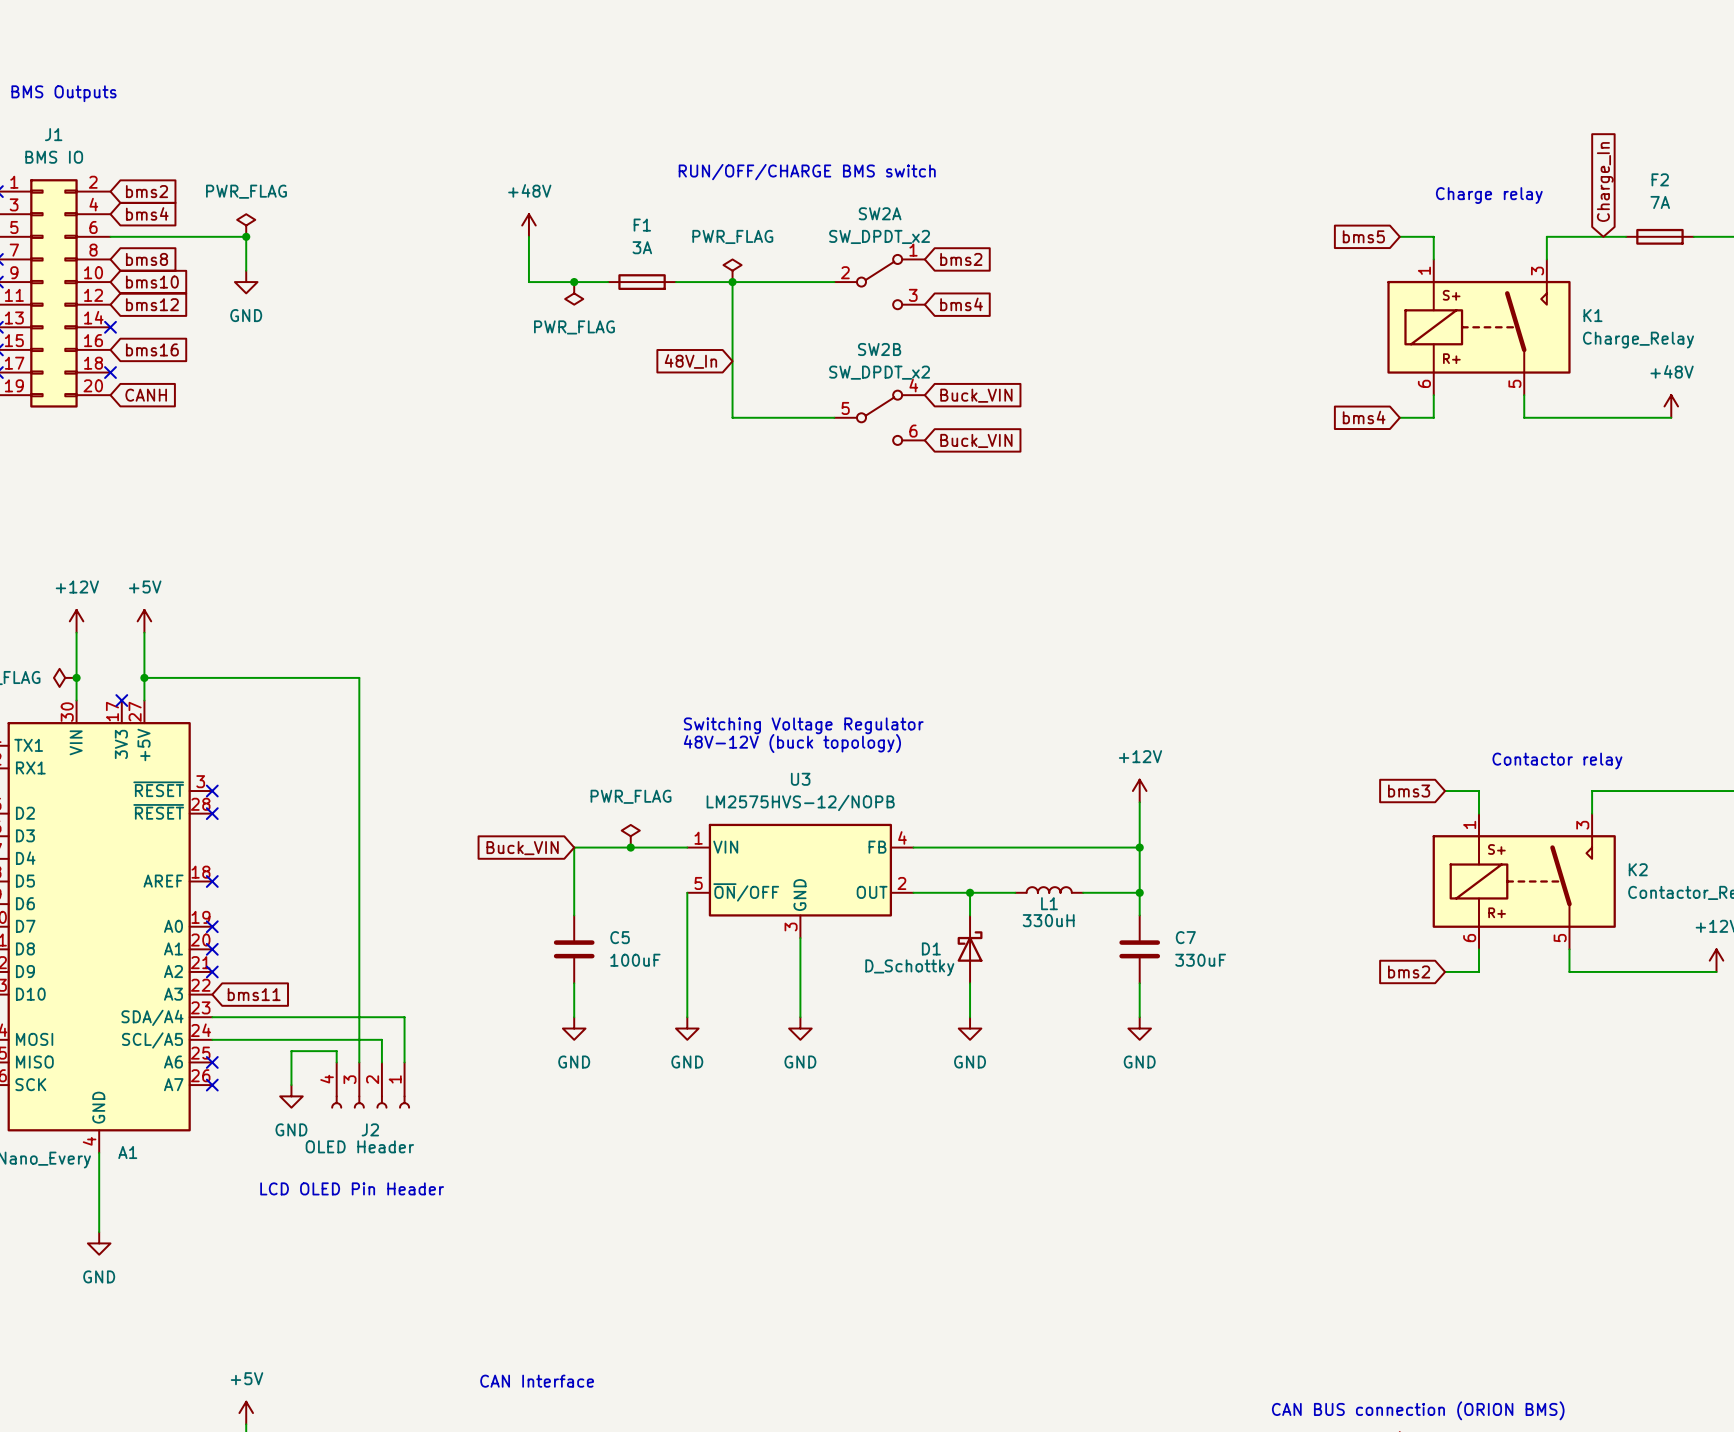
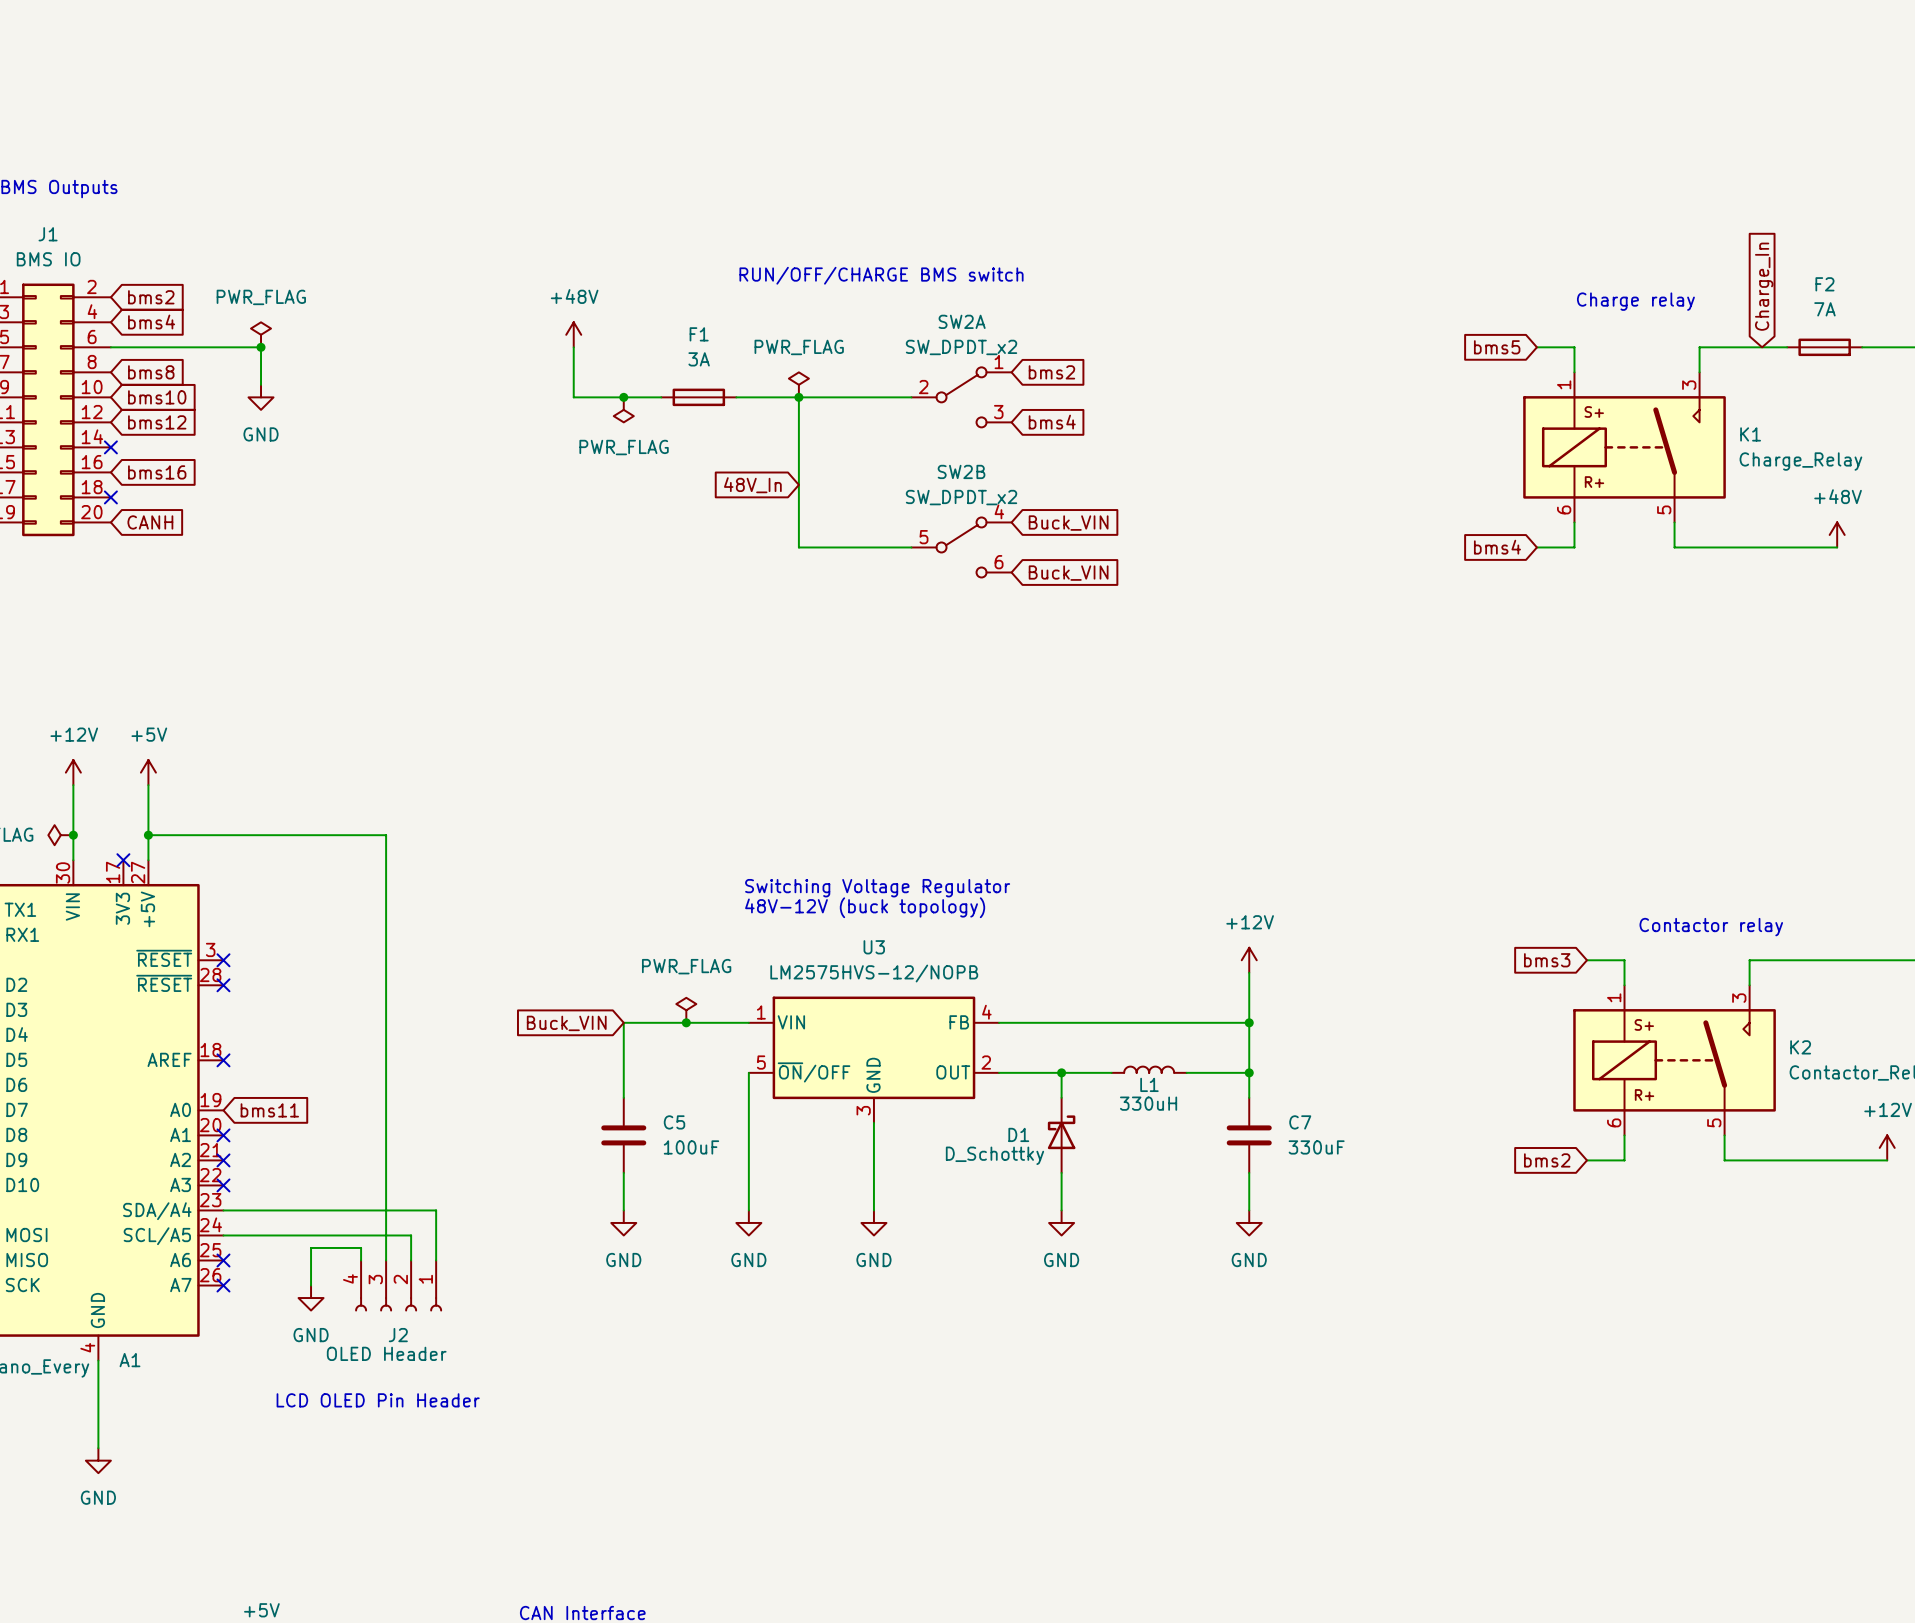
no-connect mark: (212, 926) -> none
no-connect mark: none -> (223, 1185)
global label position: bms11 (254, 994) -> bms11 (269, 1110)

